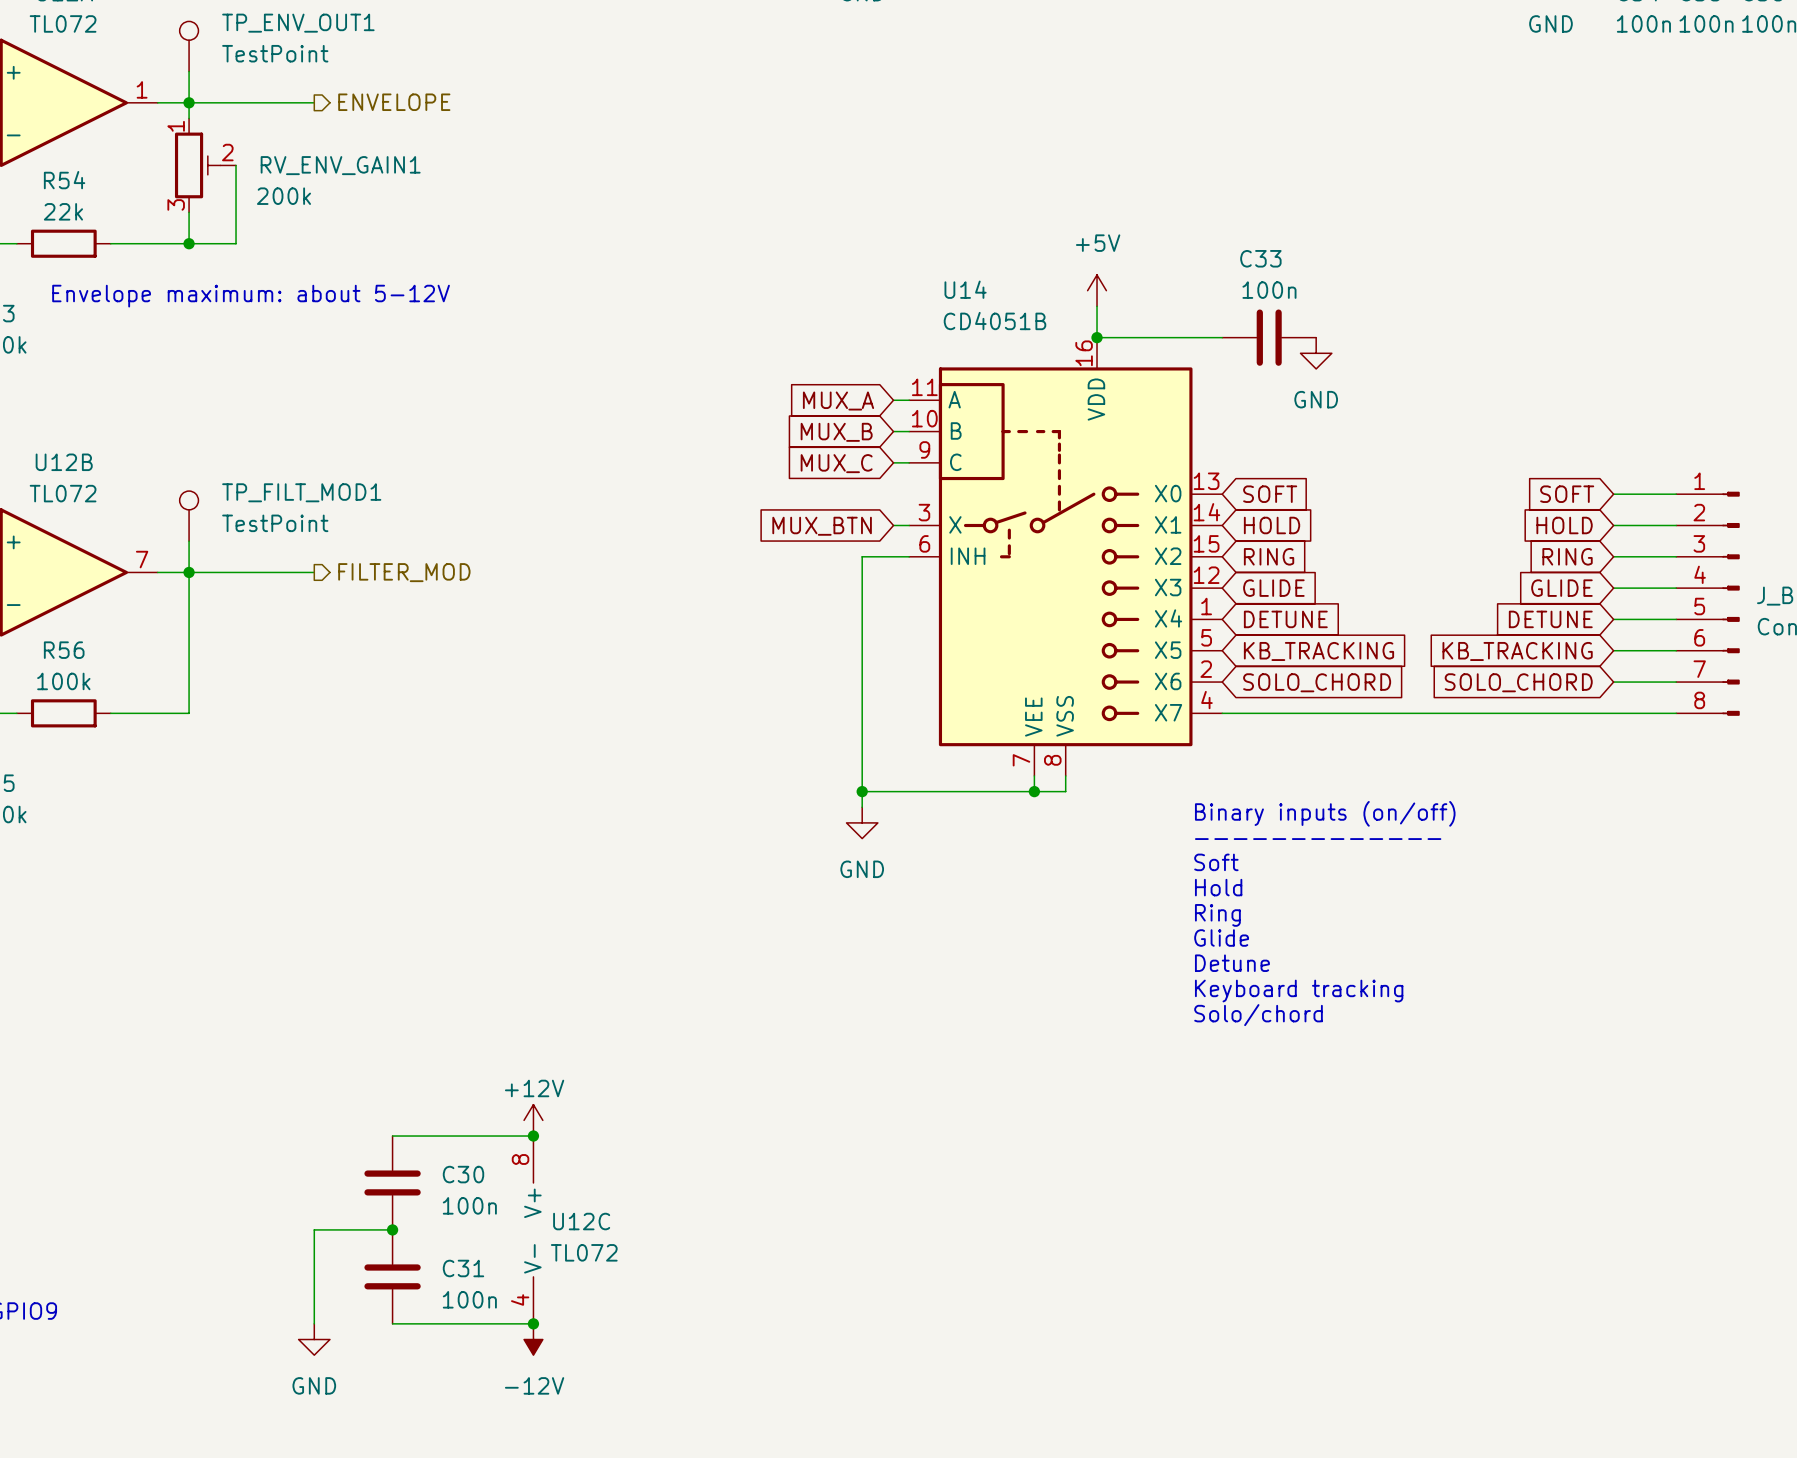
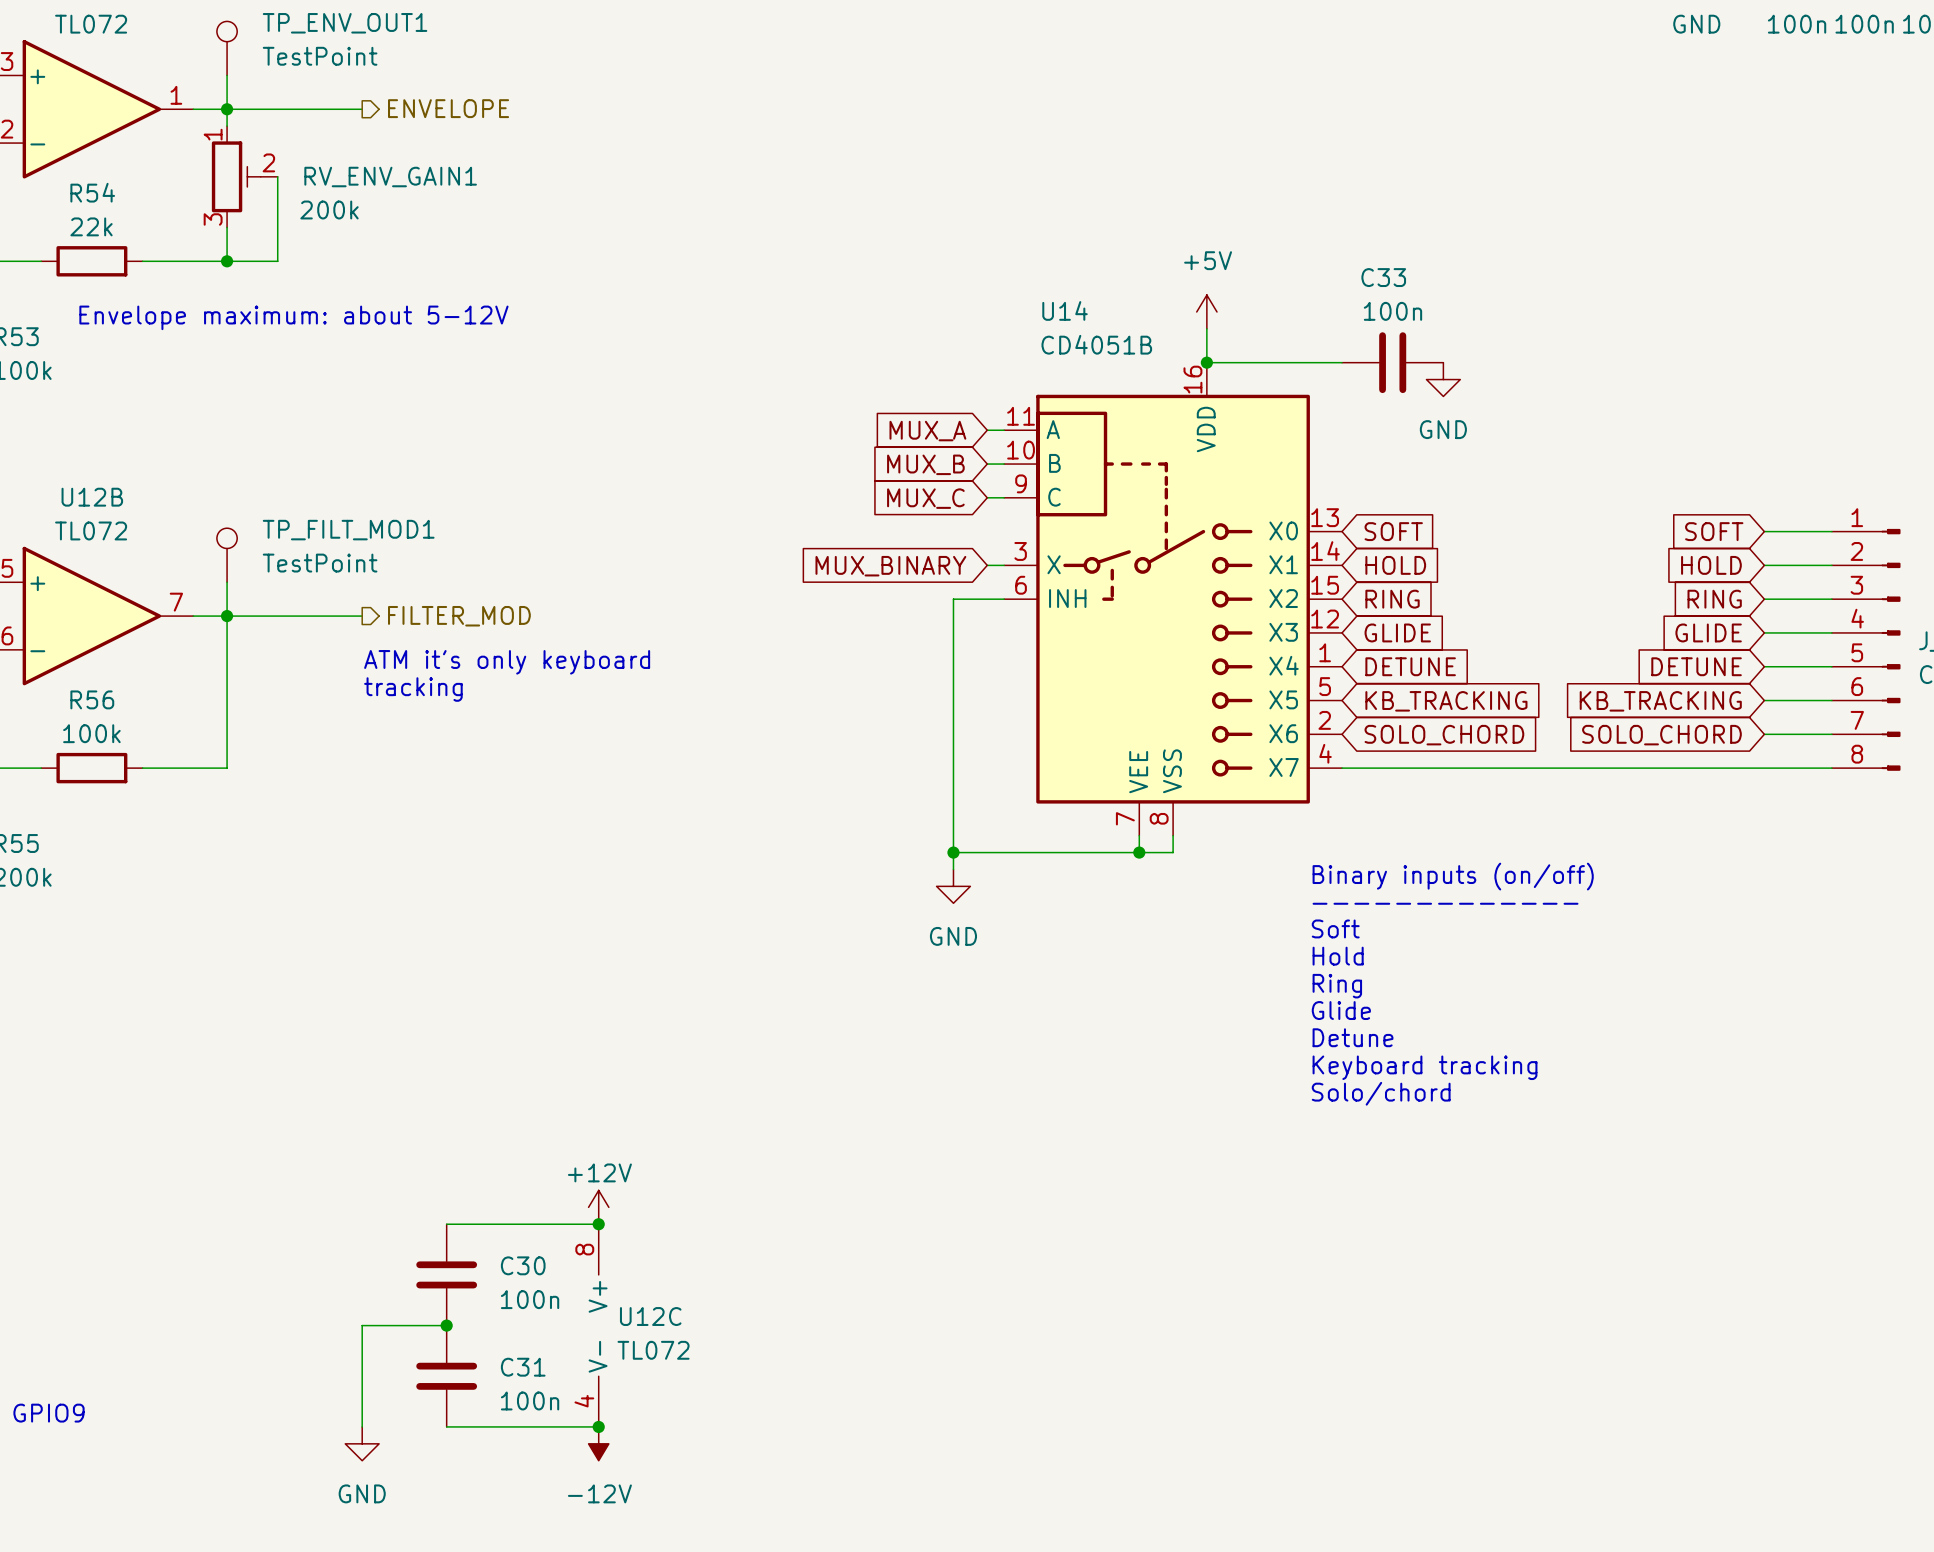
global label: MUX_BTN (822, 526) -> MUX_BINARY (890, 566)
text: none -> ATM it's only keyboard (507, 662)
text: none -> tracking (413, 689)

